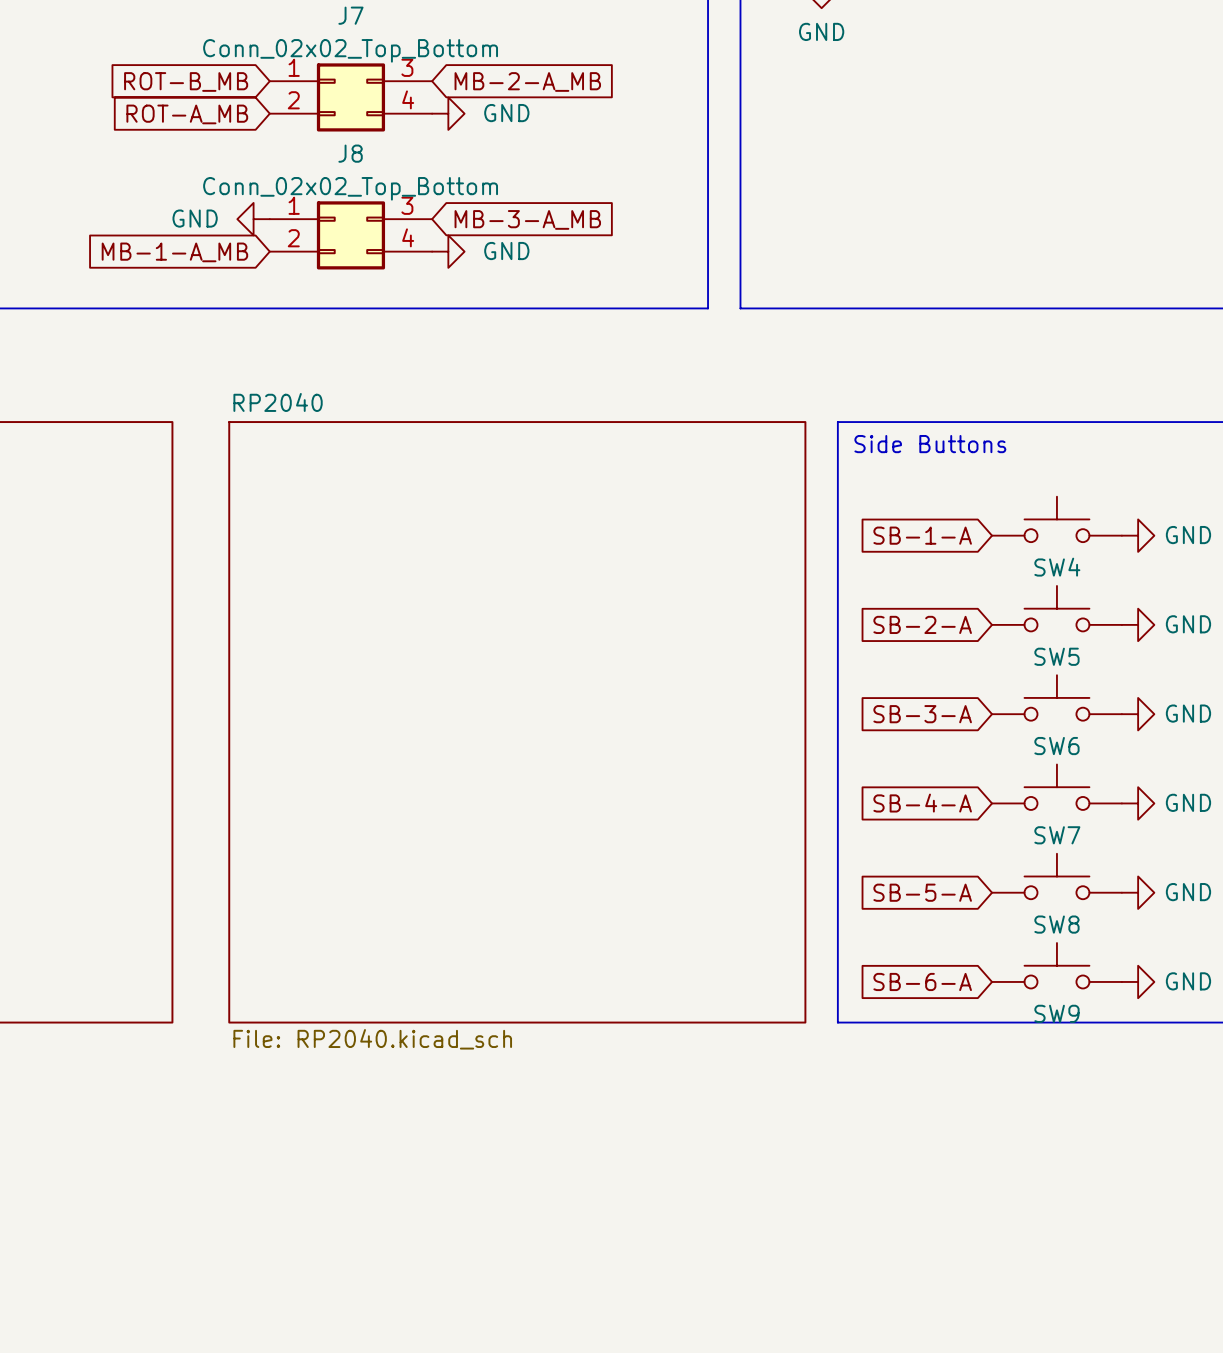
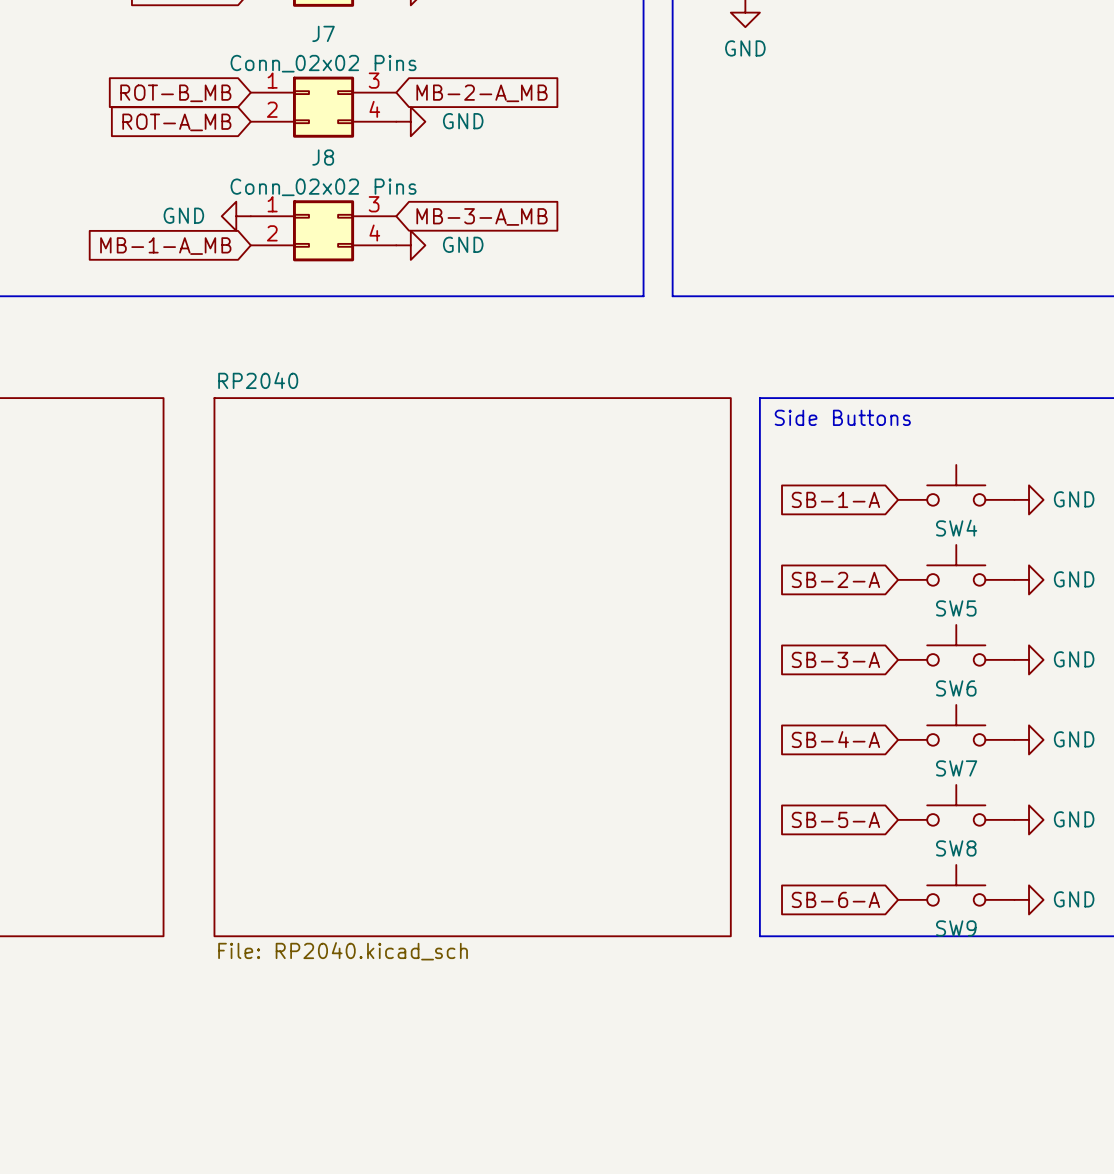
J7 value: Conn_02x02_Top_Bottom (350, 50) -> Conn_02x02 Pins (323, 63)
J8 value: Conn_02x02_Top_Bottom (350, 188) -> Conn_02x02 Pins (323, 187)

